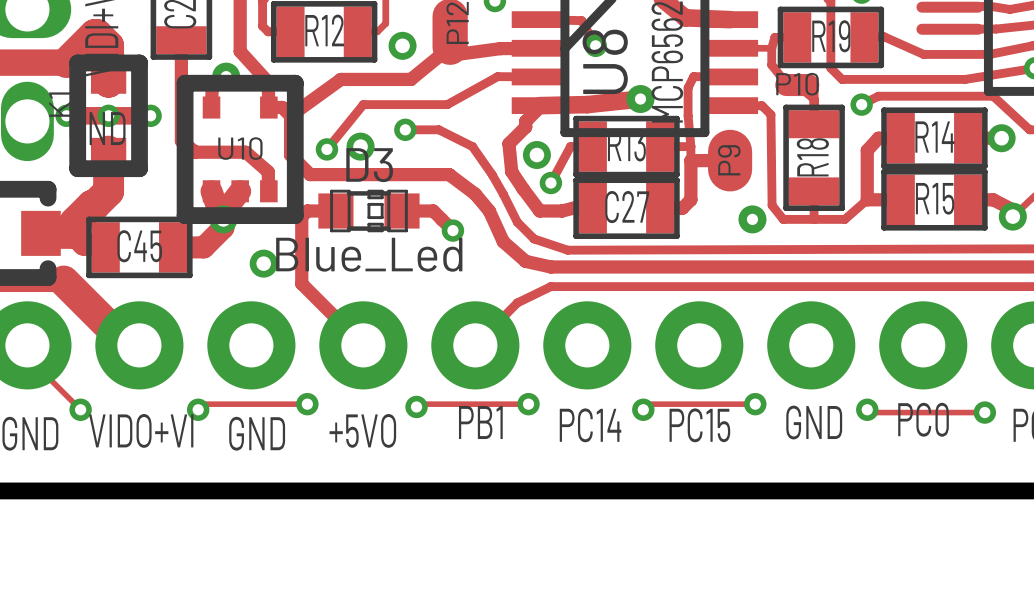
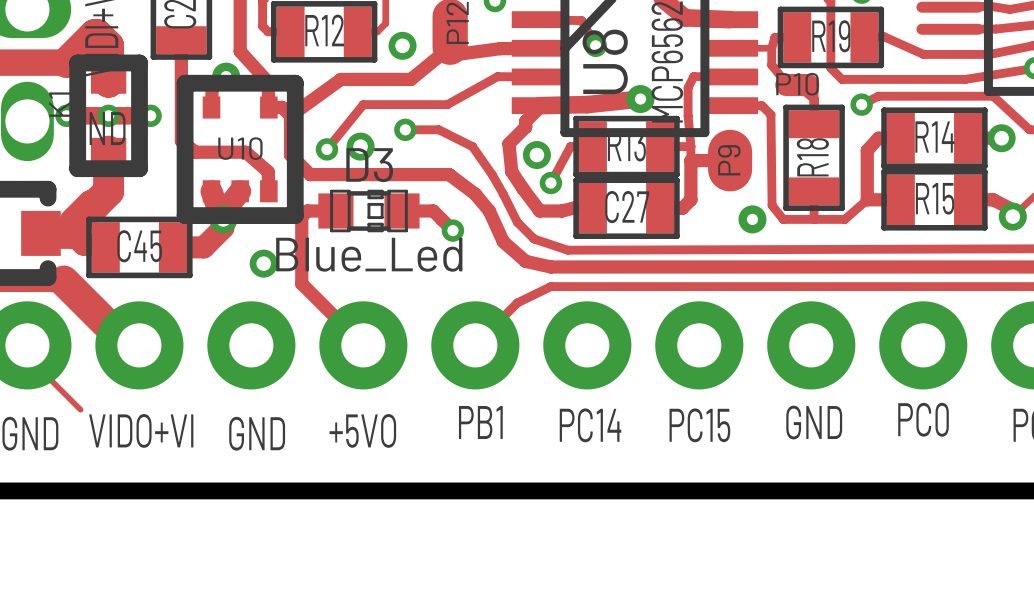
track: (307, 404) (203, 404) (198, 409) -> none
via: (307, 404) -> none
track: (528, 404) (419, 404) (416, 406) -> none
via: (528, 404) -> none
track: (755, 404) (648, 404) (643, 409) -> none
via: (755, 404) -> none
via: (416, 406) -> none
via: (80, 409) -> none
via: (198, 409) -> none
via: (643, 409) -> none
track: (867, 409) (870, 412) (984, 412) -> none
via: (867, 409) -> none
via: (984, 412) -> none

